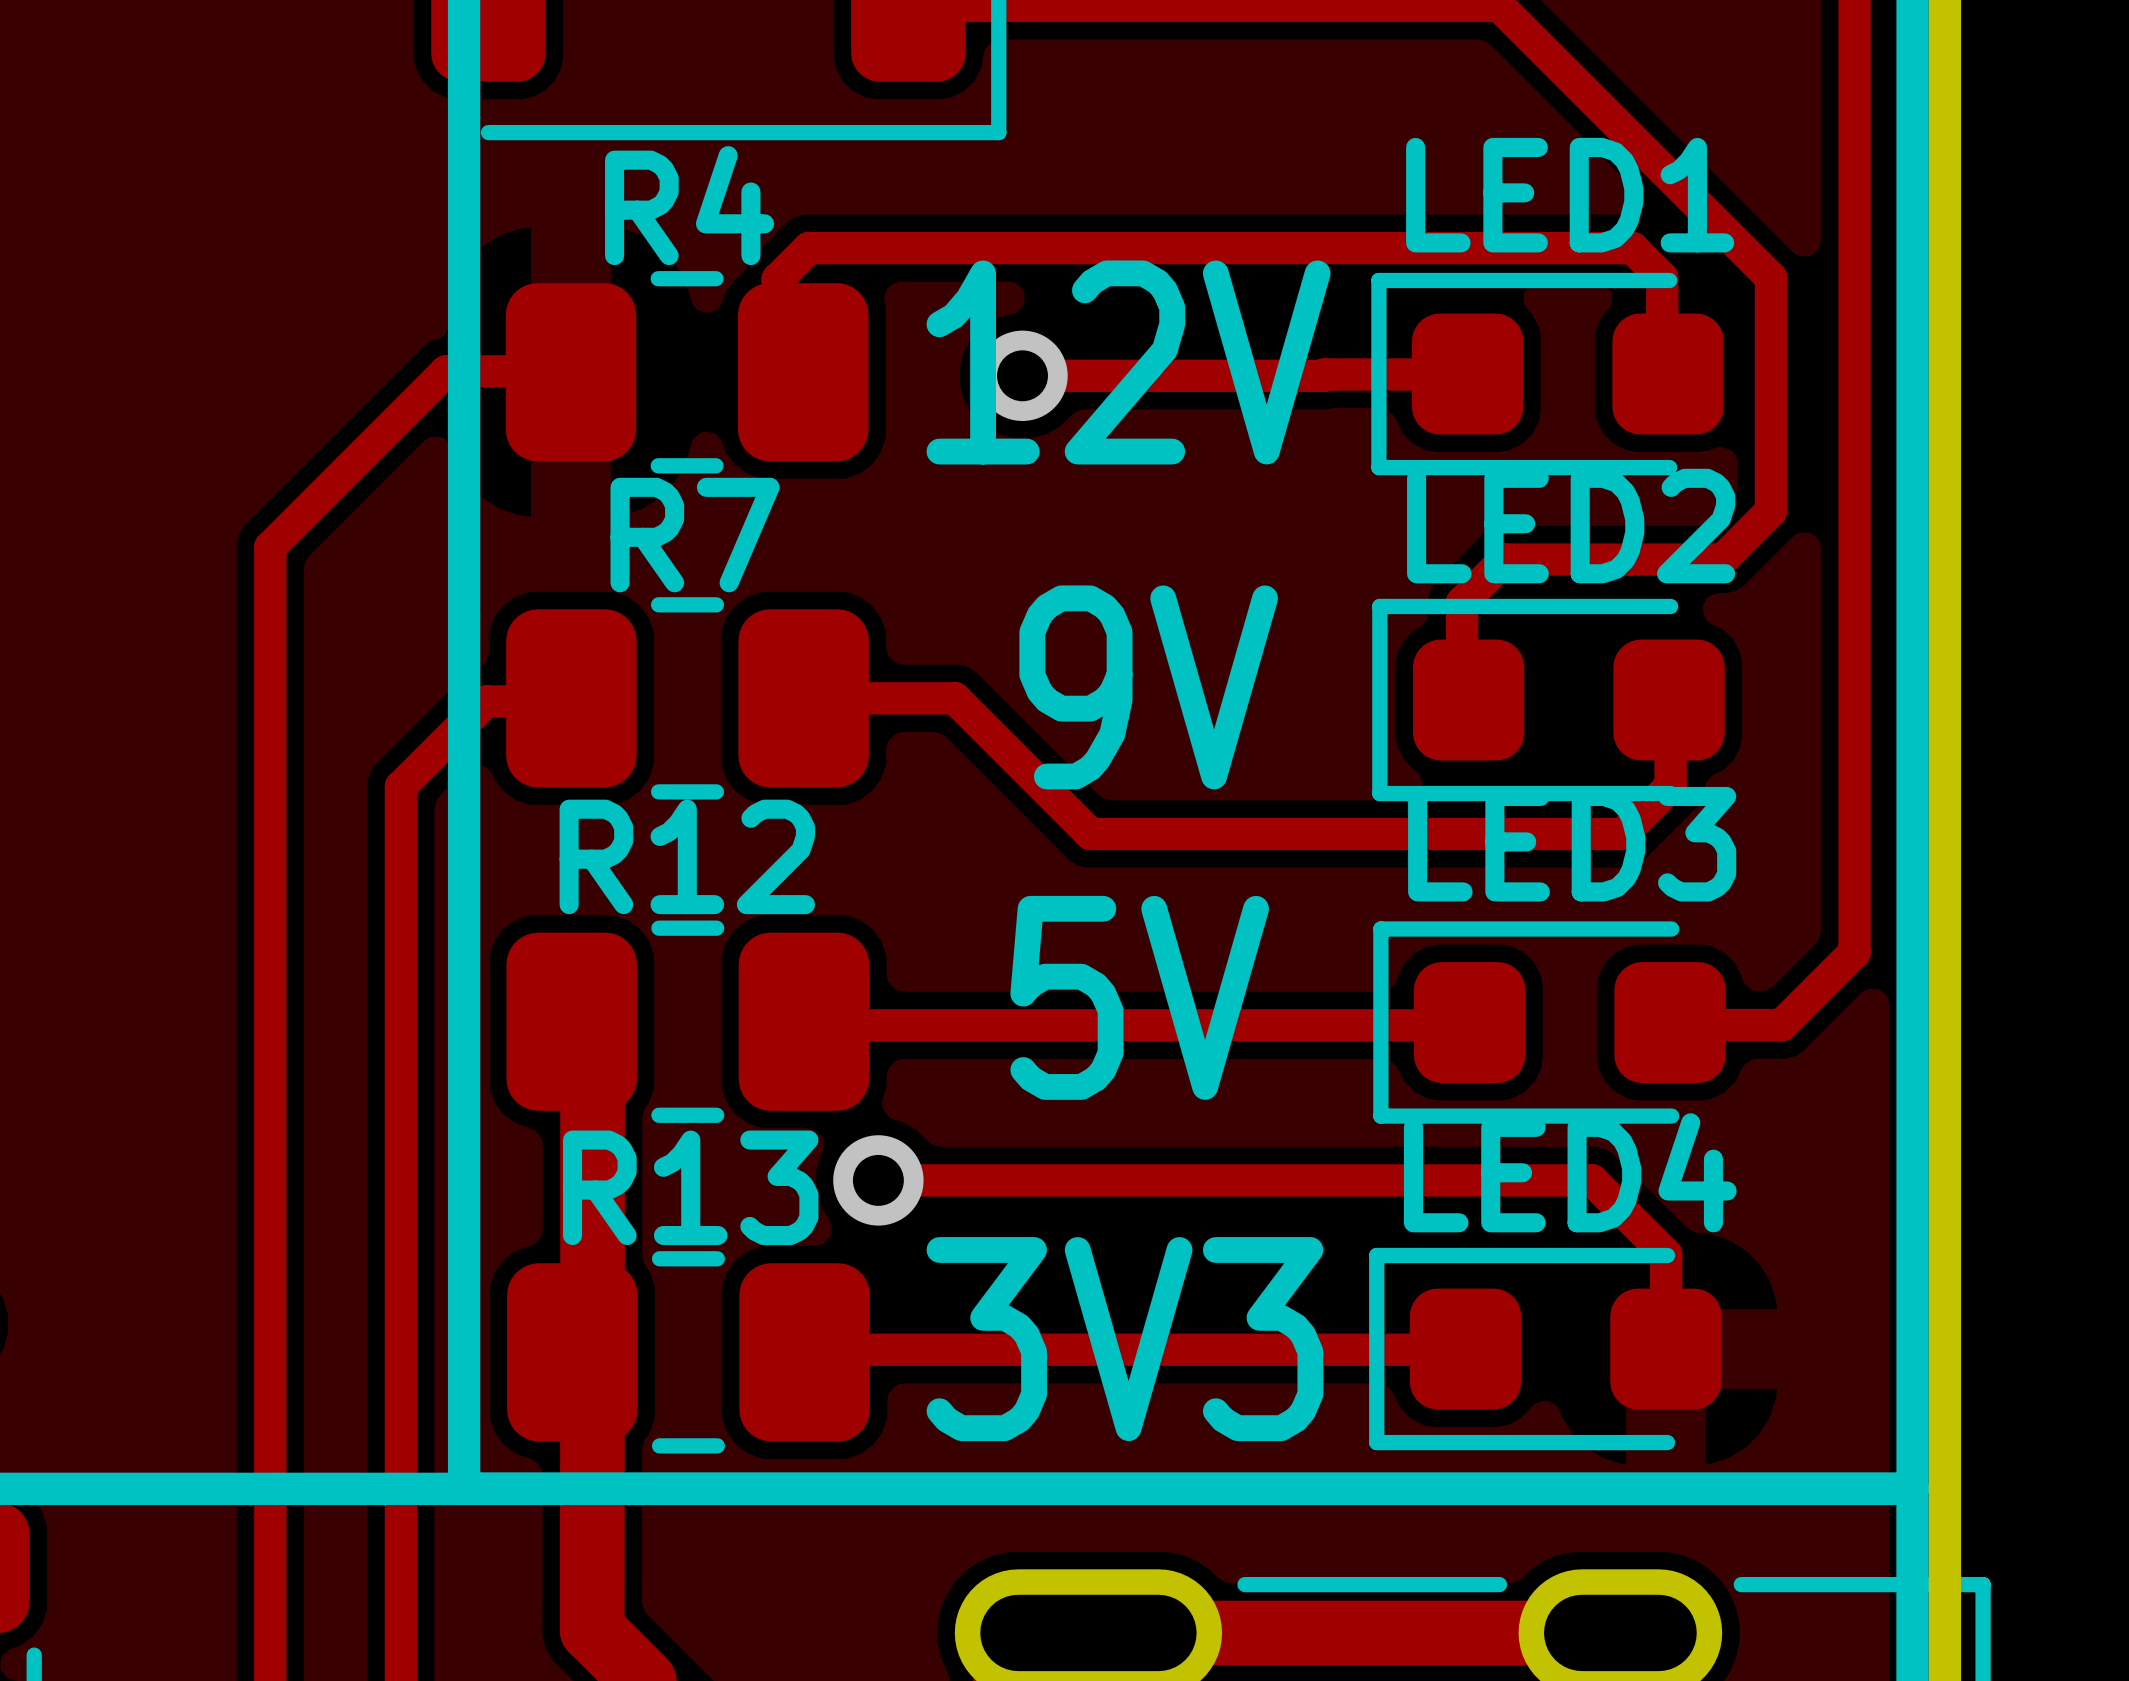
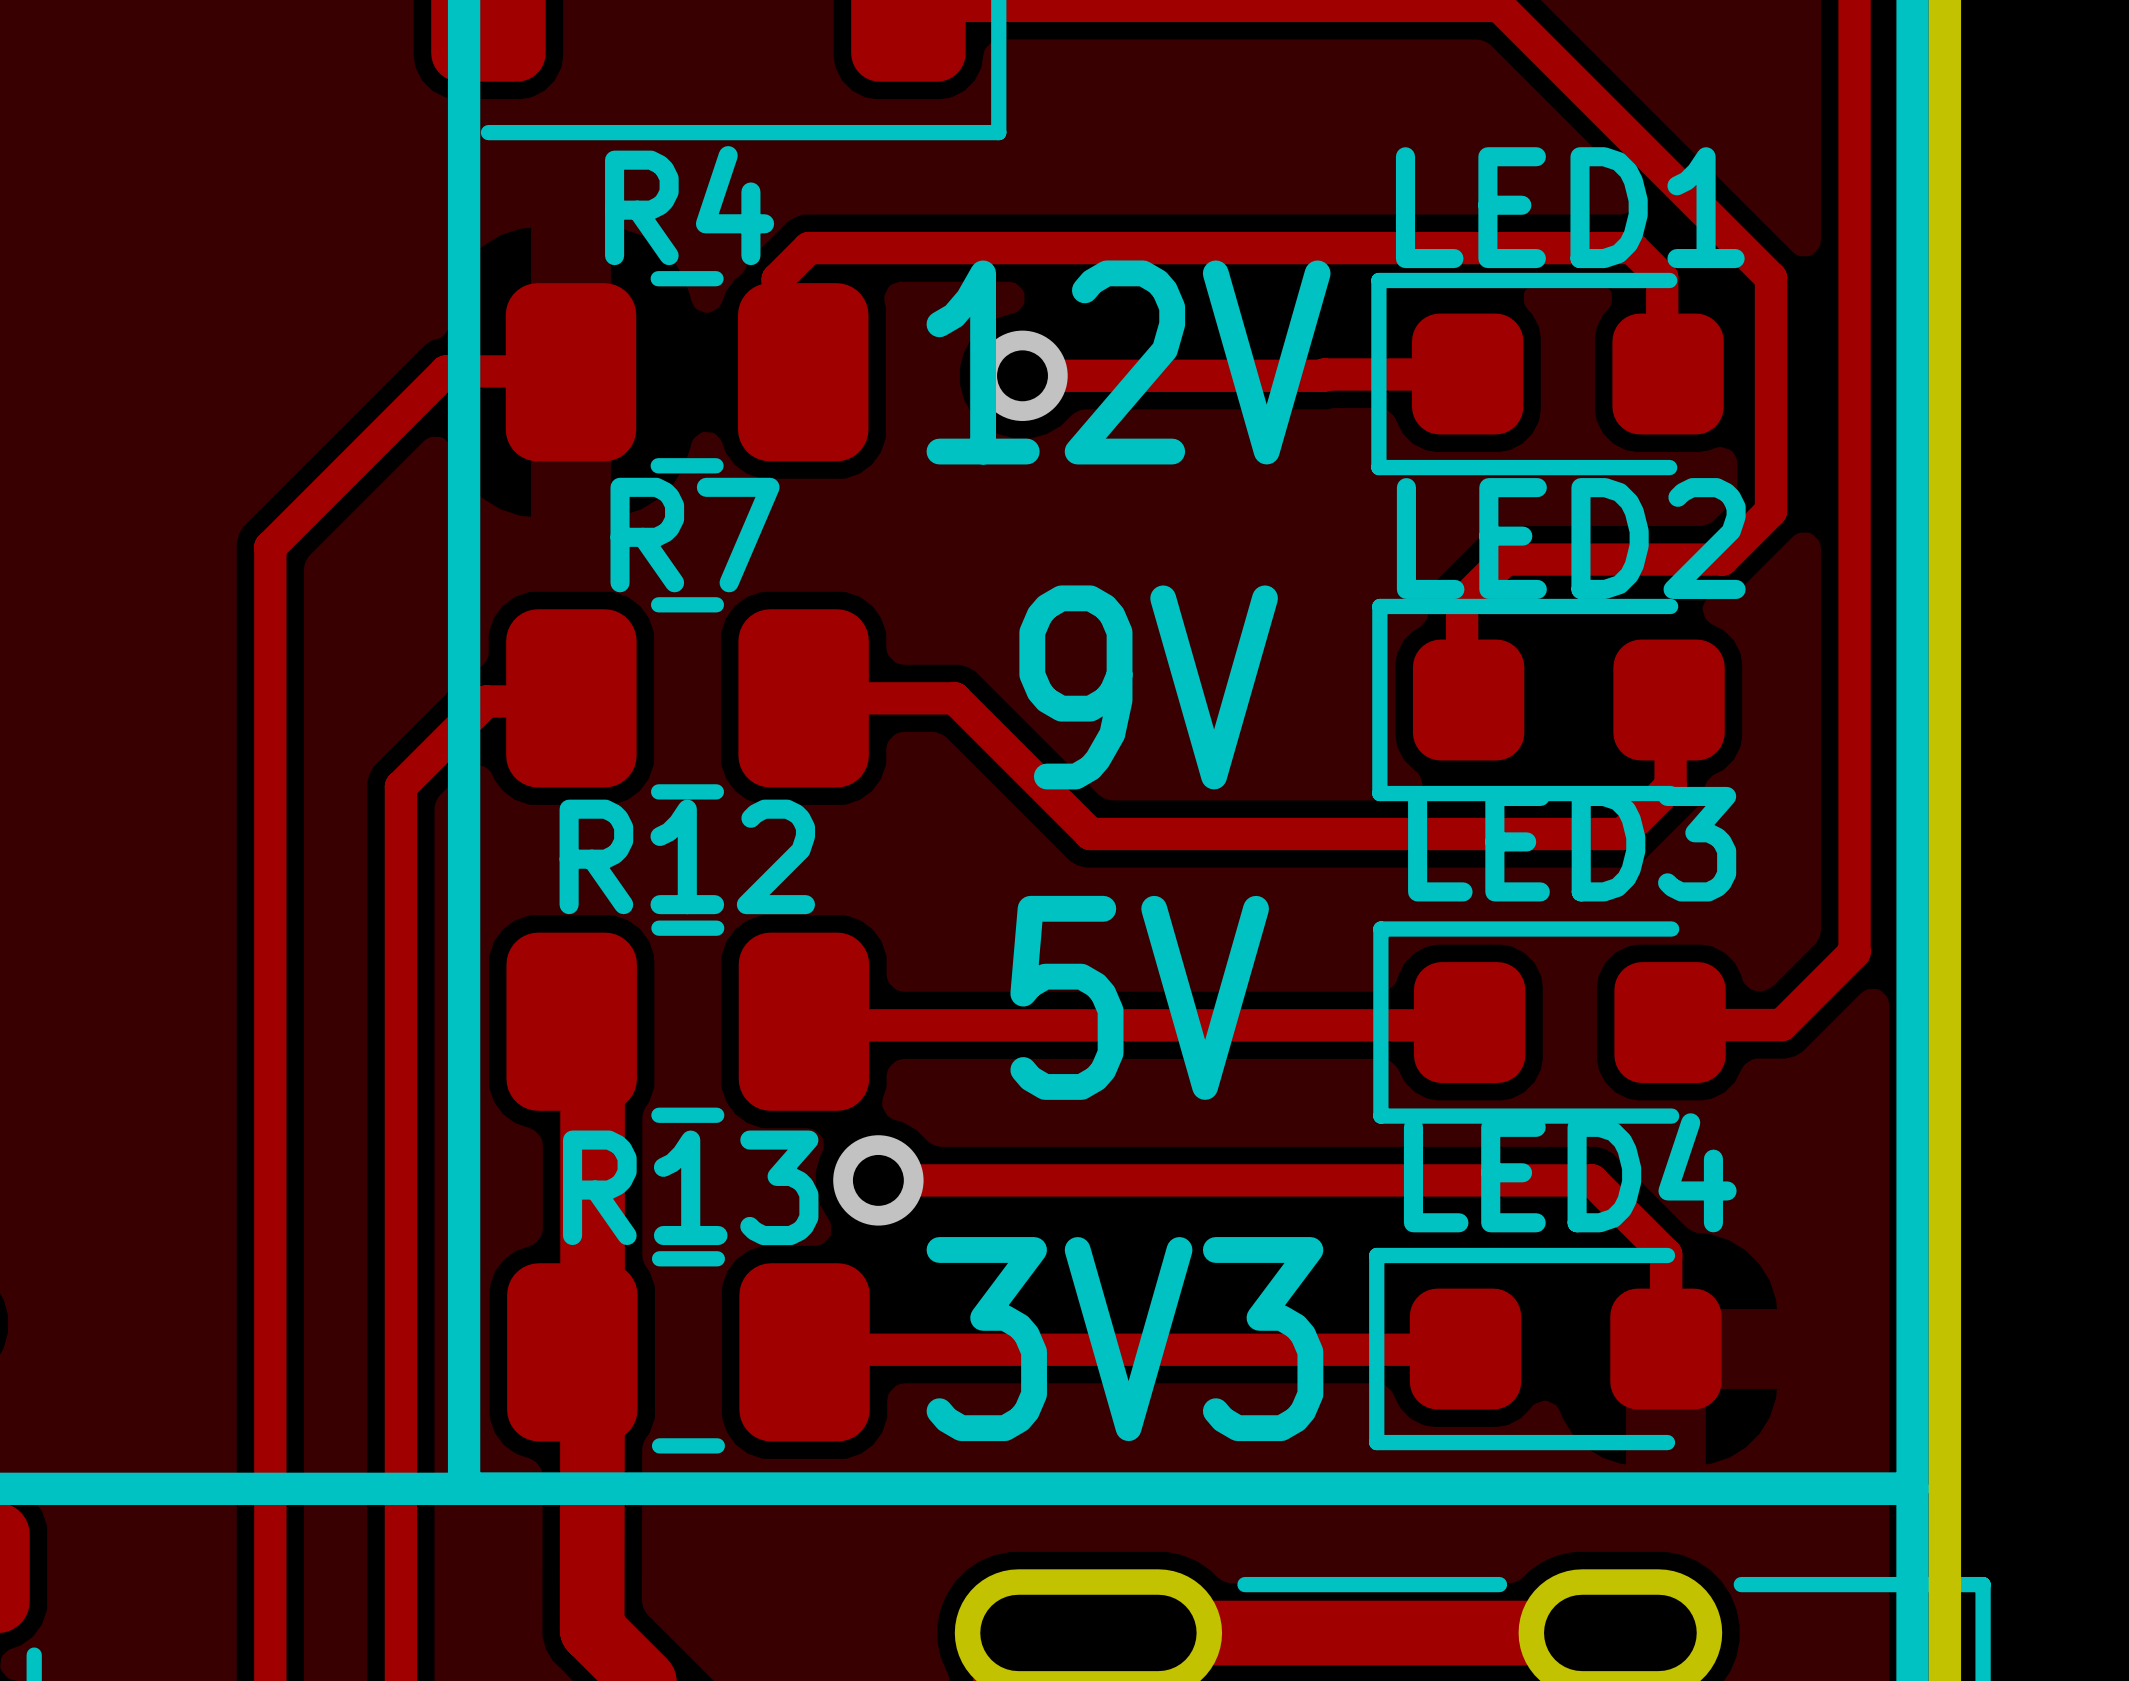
LED1 name position: LED1 (1570, 195) -> LED1 (1570, 207)
LED2 name position: LED2 (1571, 526) -> LED2 (1571, 538)

